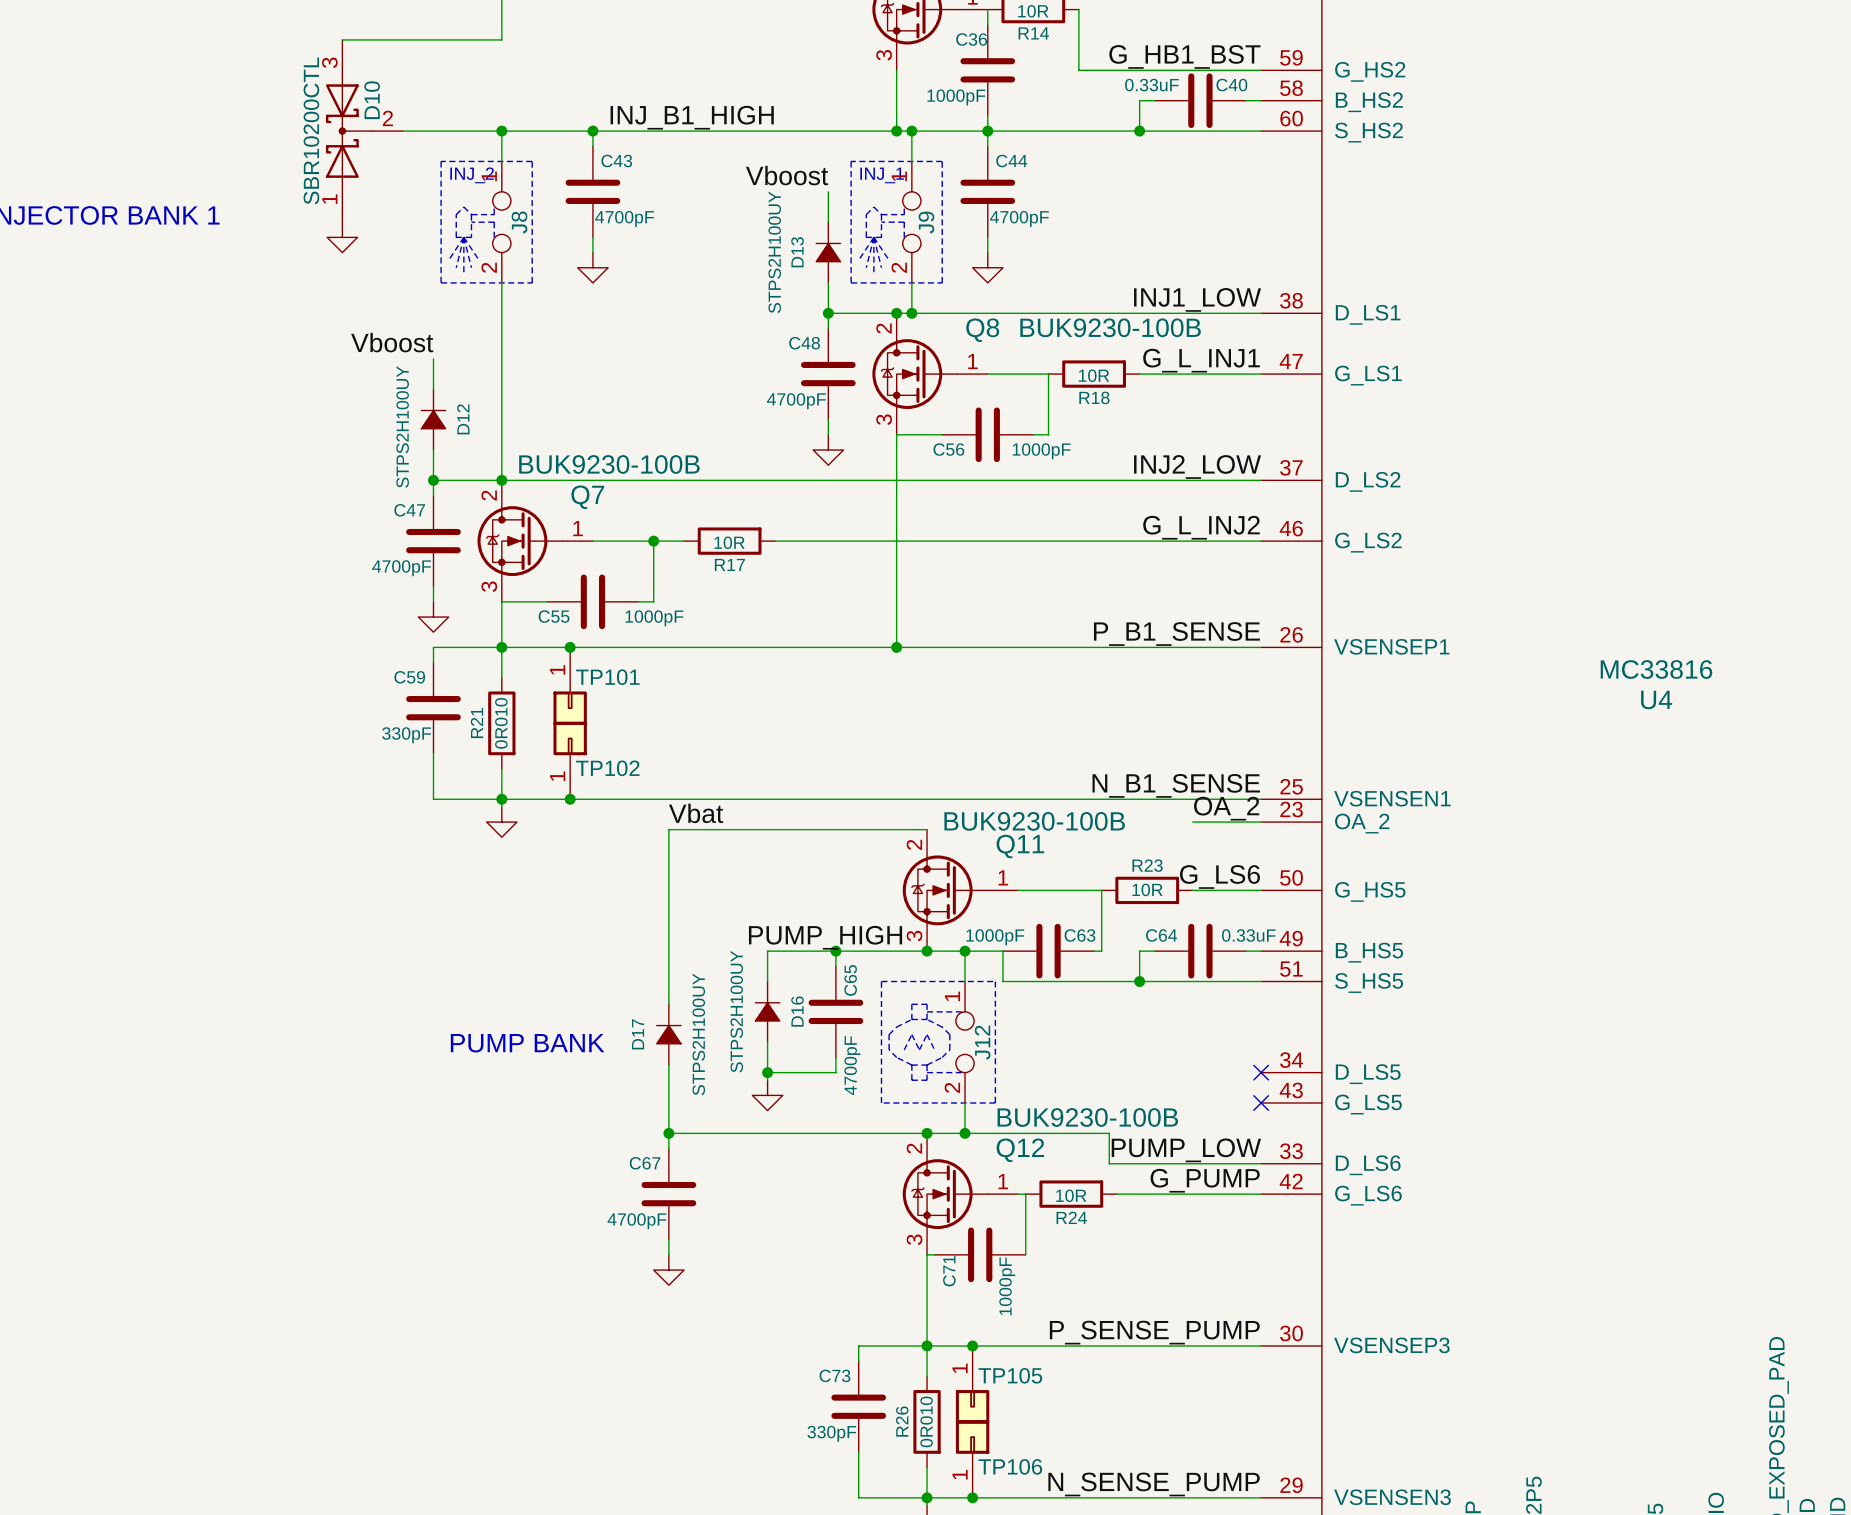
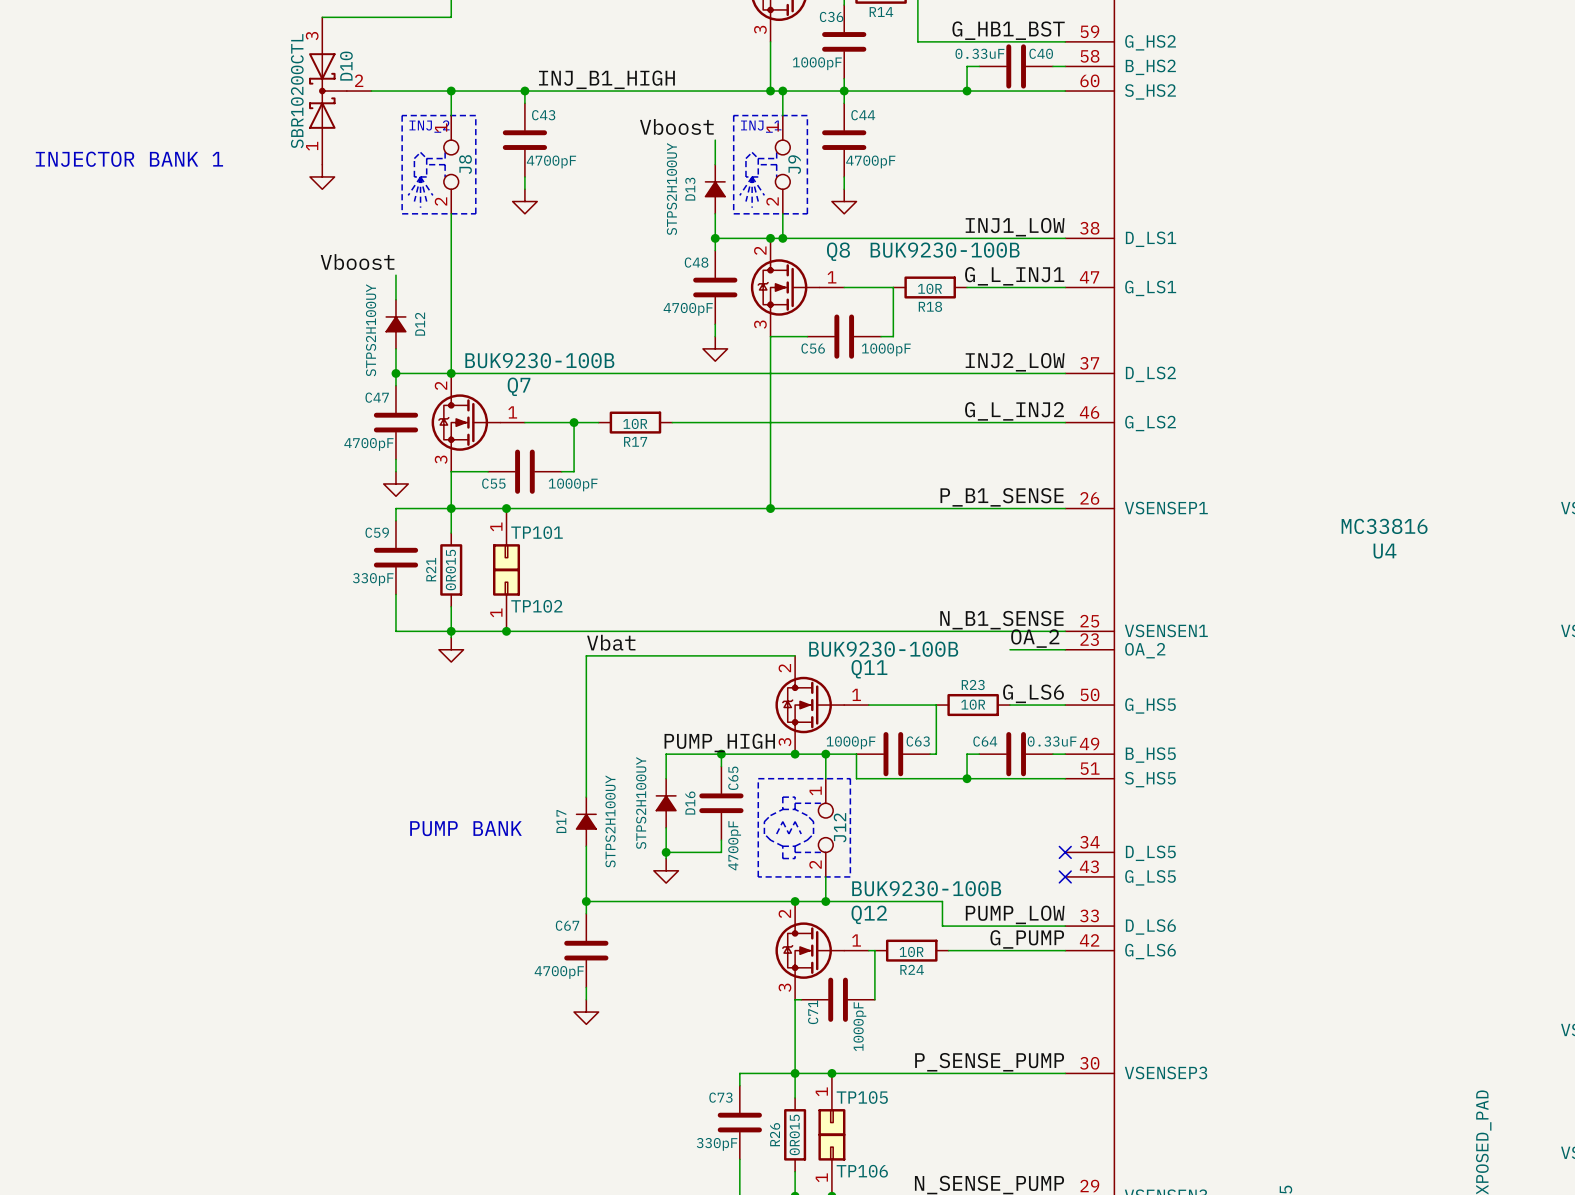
R21 value: 0R010 (501, 723) -> 0R015 (450, 570)
R26 value: 0R010 (926, 1421) -> 0R015 (794, 1134)

